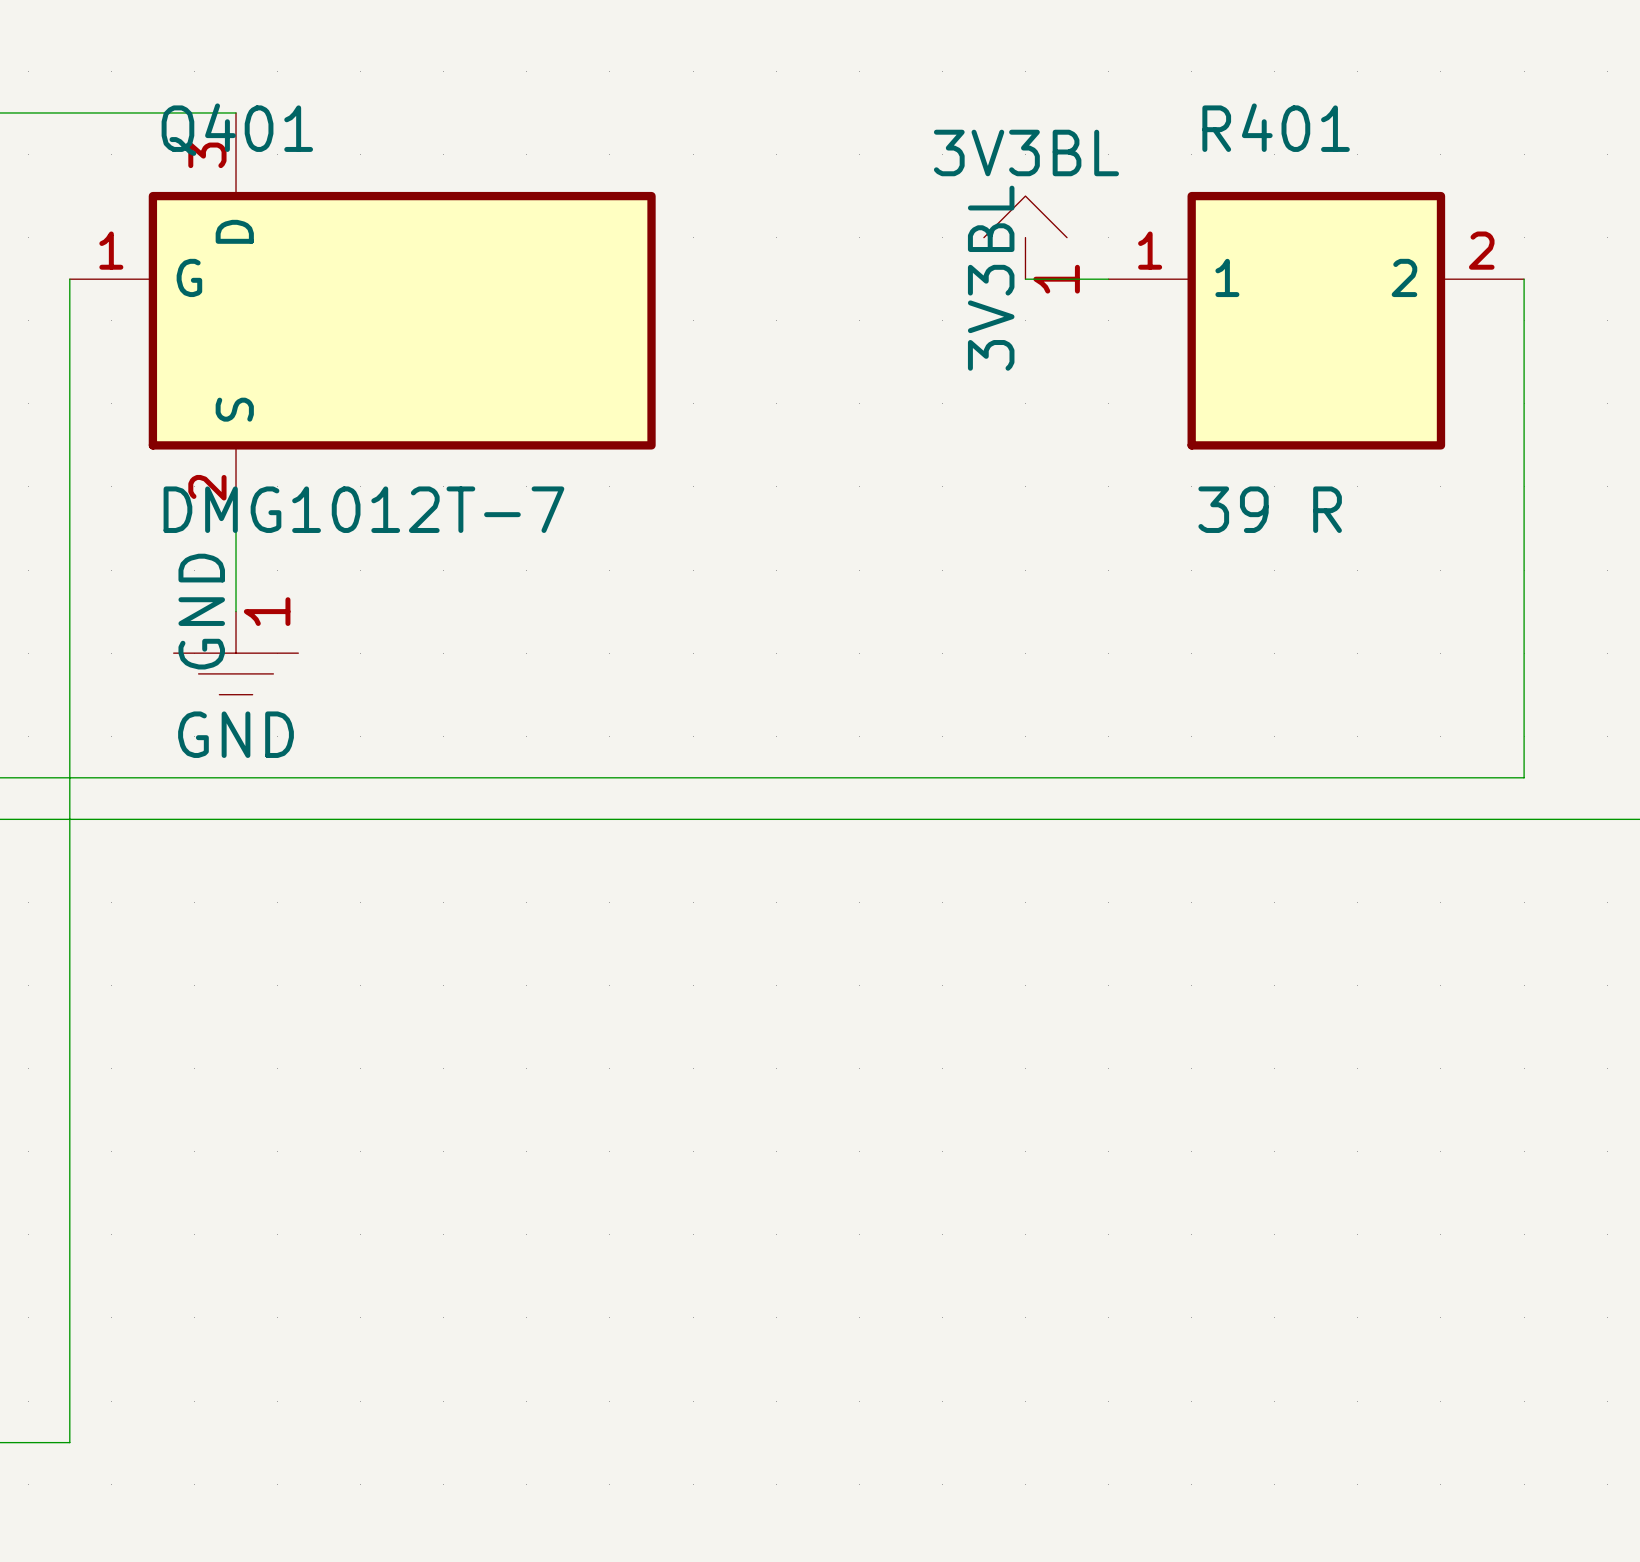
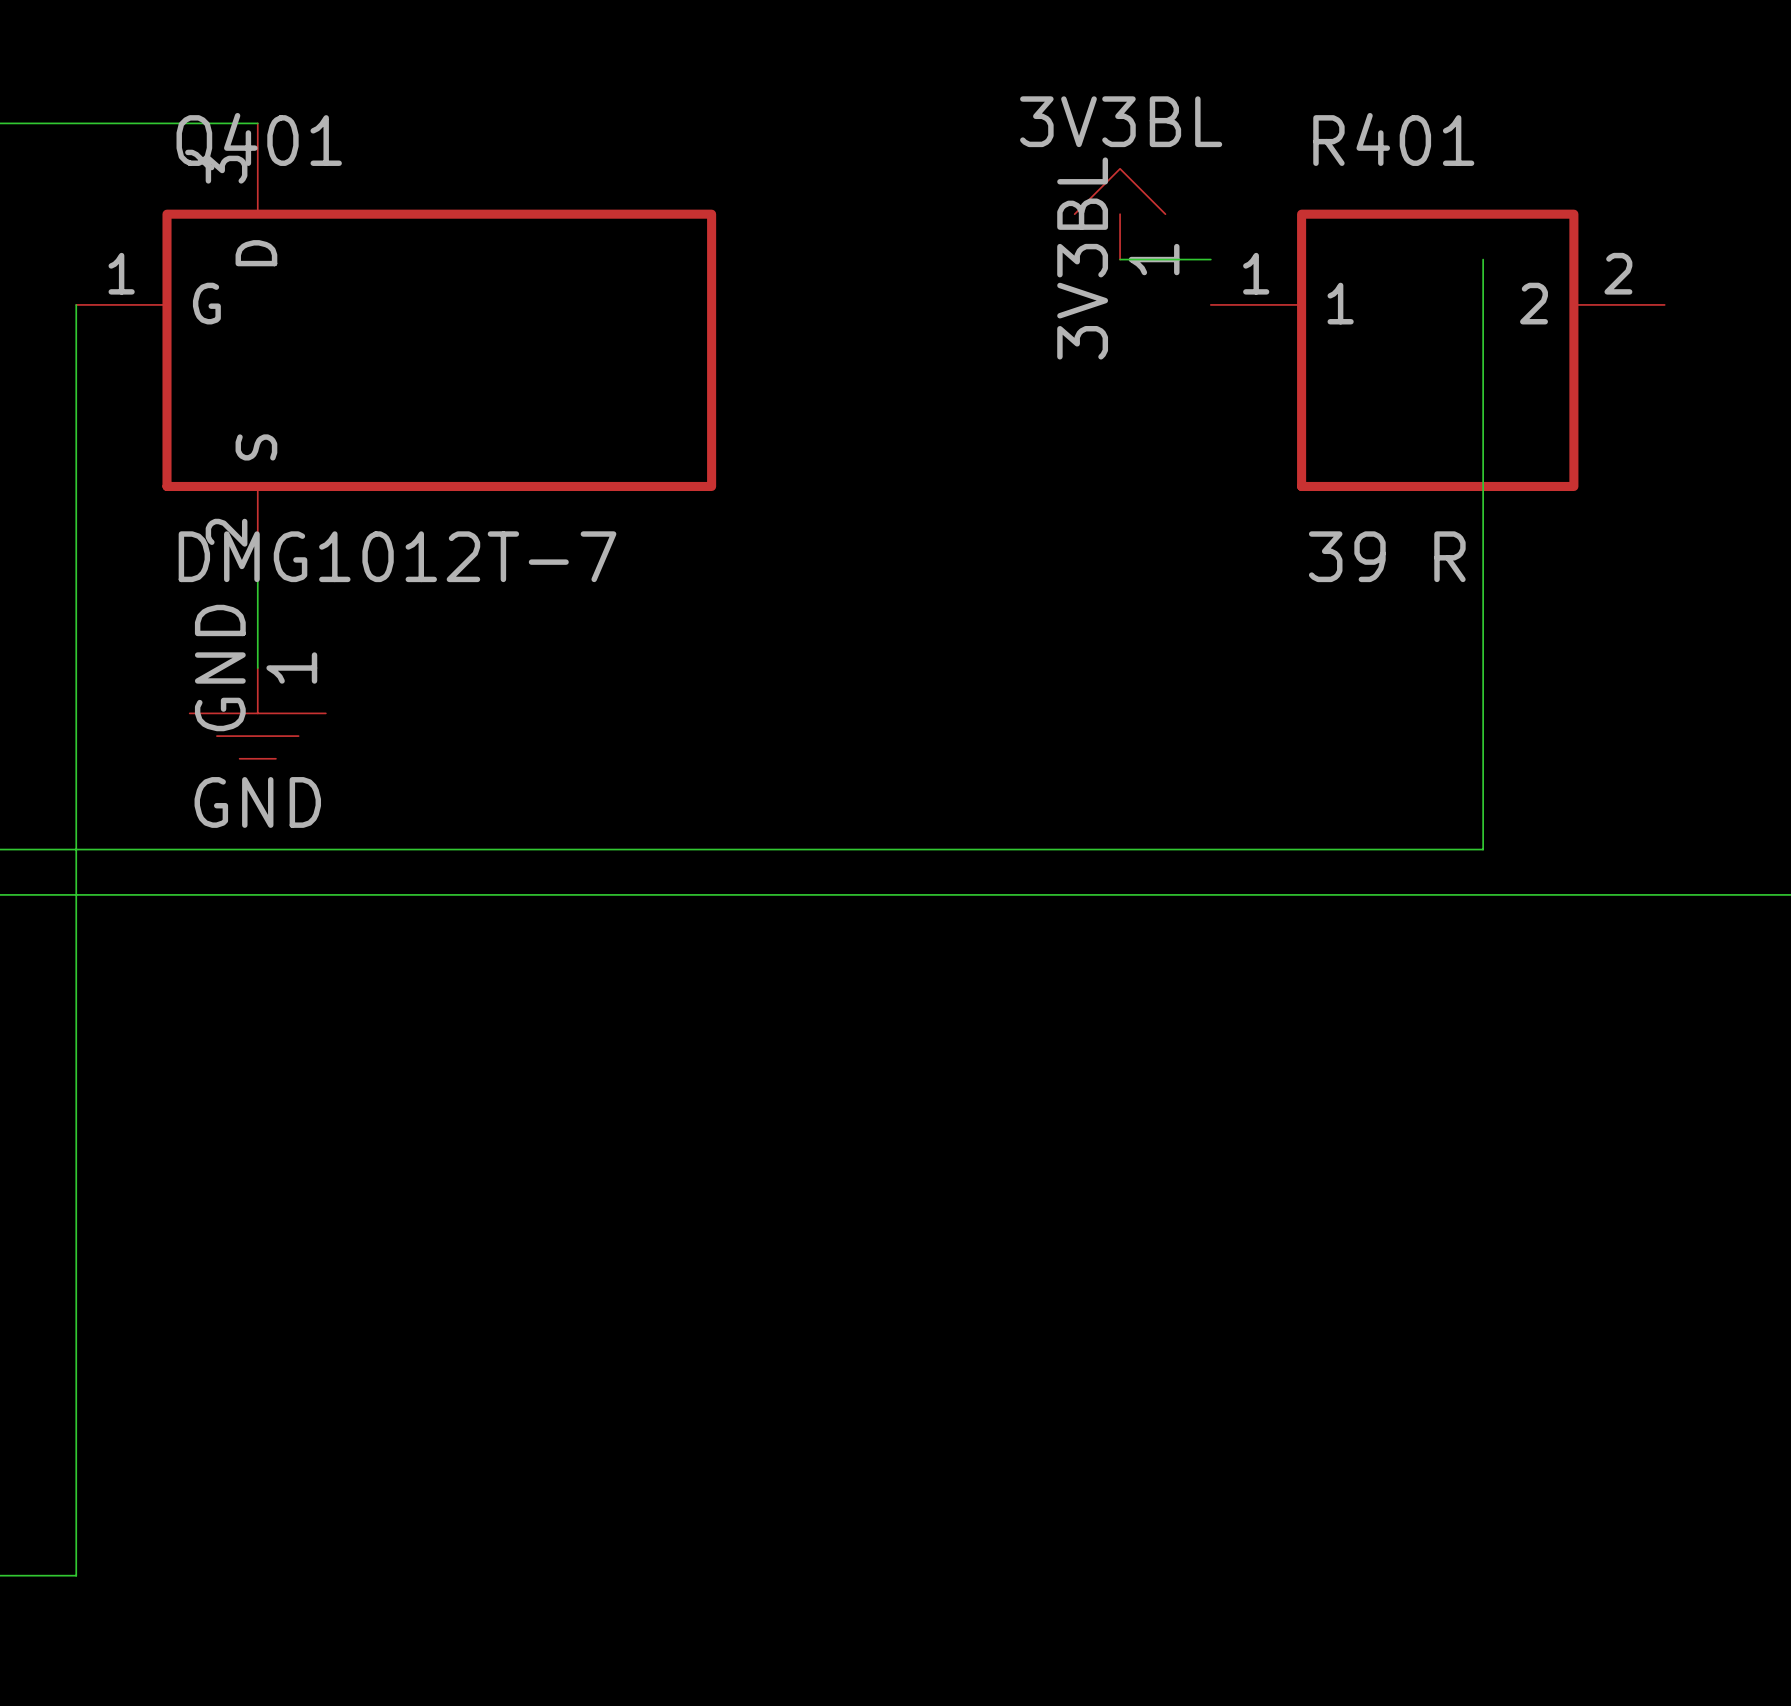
power symbol position: 3V3BL (1025, 237) -> 3V3BL (1120, 214)
wire: (1025, 279) (1108, 279) -> (1120, 259) (1210, 259)
wire: (1524, 279) (1524, 777) (1357, 777) -> (1483, 259) (1483, 849)

